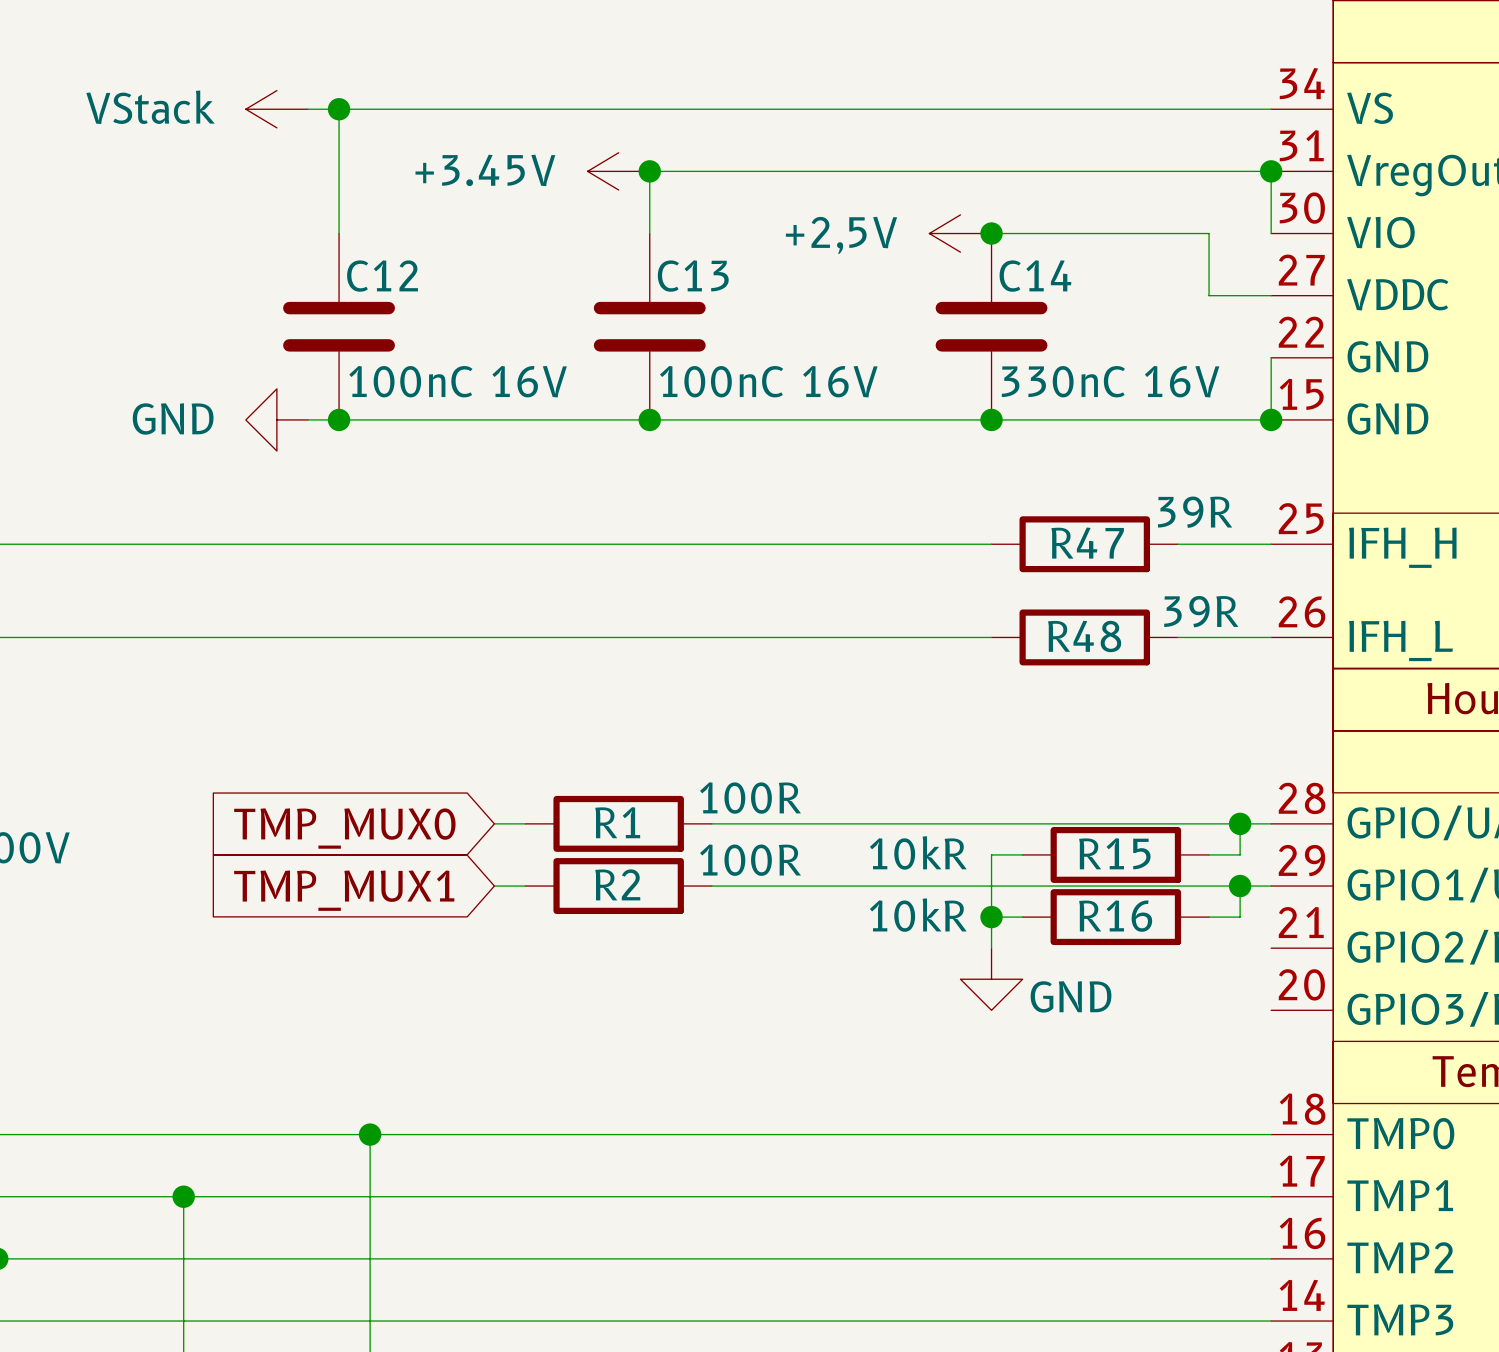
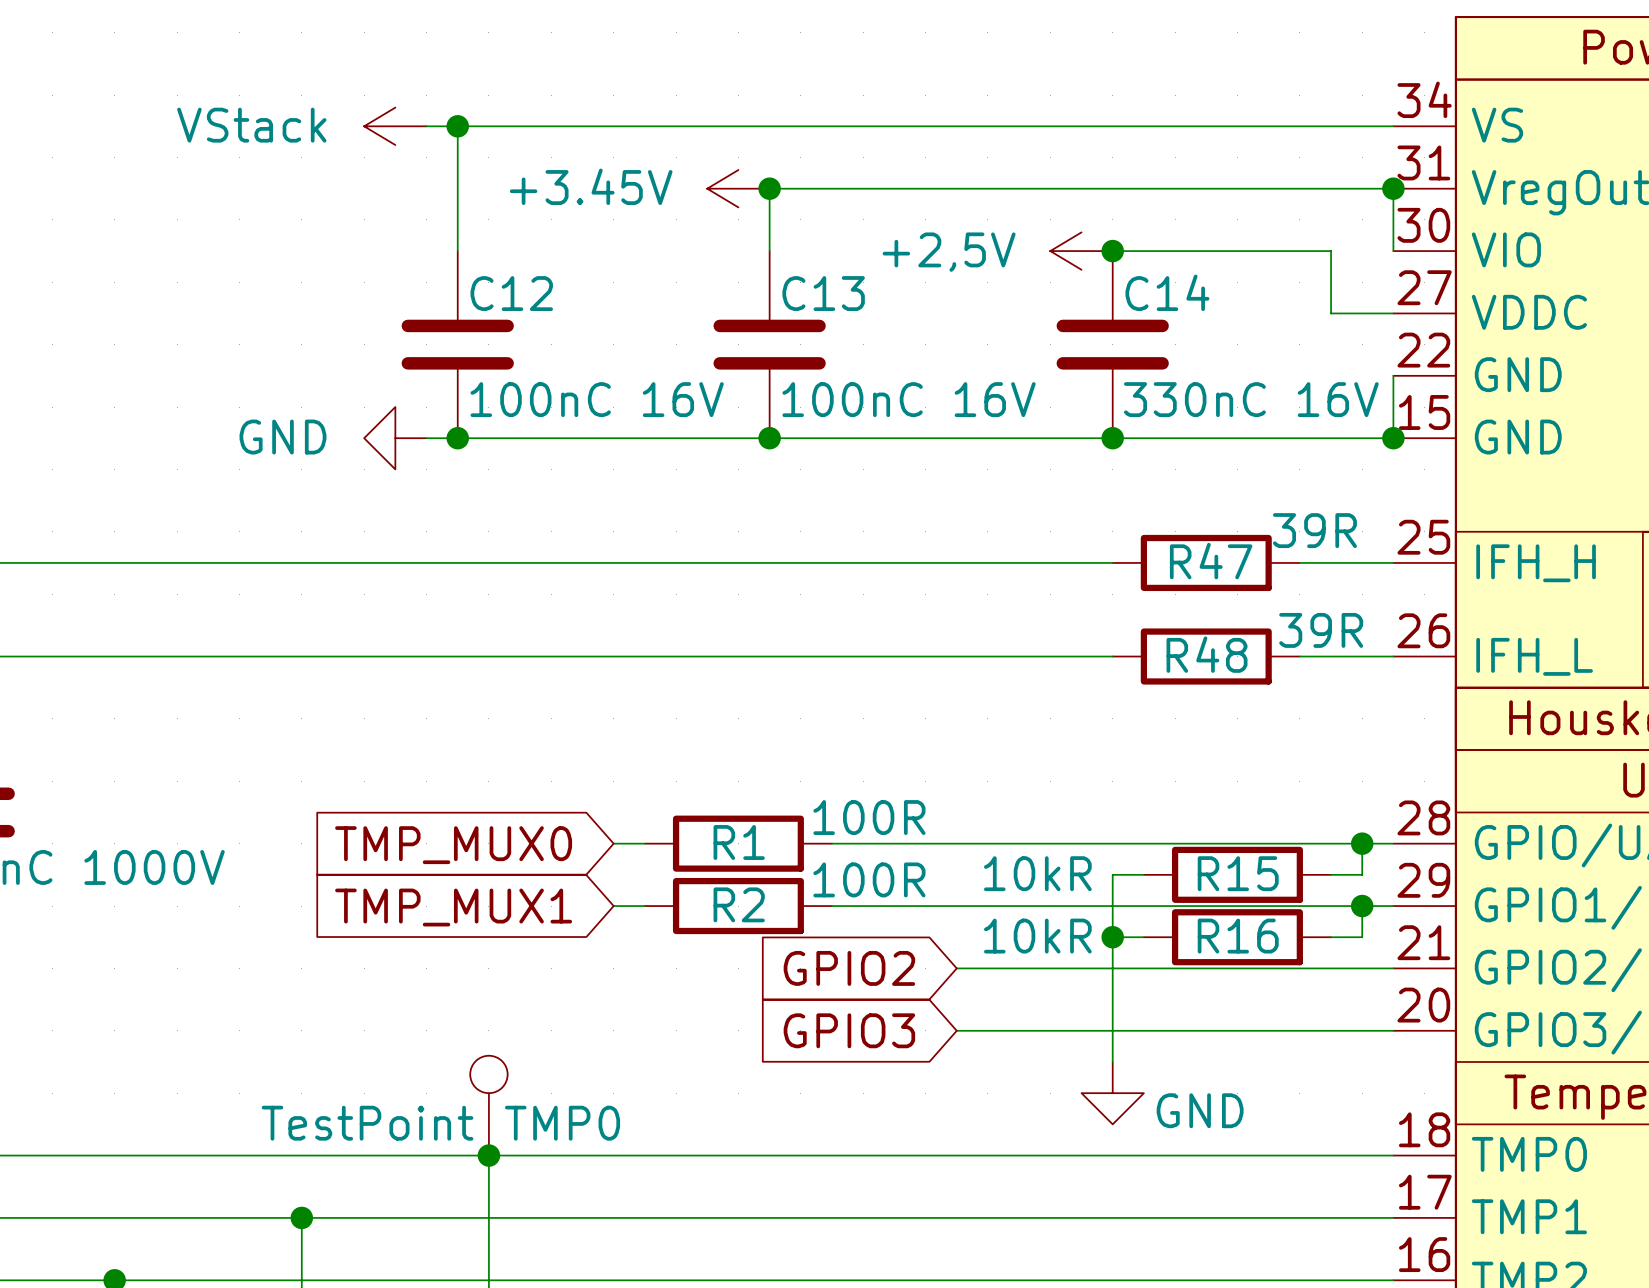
global label: none -> GPIO2 (849, 968)
wire: none -> (956, 968) (1393, 968)
wire: none -> (1112, 968) (1112, 1061)
power symbol position: GND (991, 979) -> GND (1112, 1093)
global label: none -> GPIO3 (849, 1030)
wire: none -> (956, 1030) (1393, 1030)
TMP0: none -> TestPoint (488, 1105)

